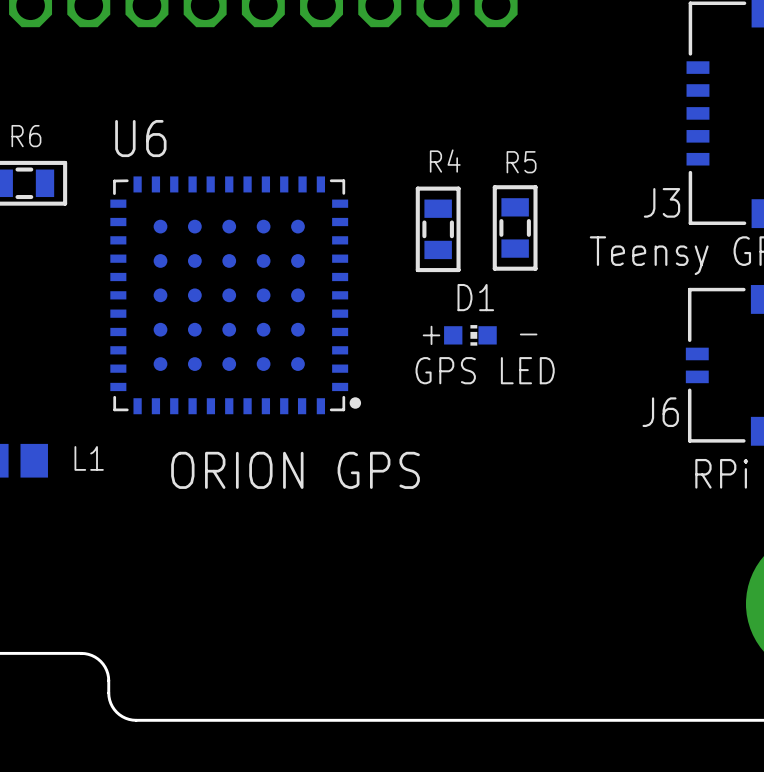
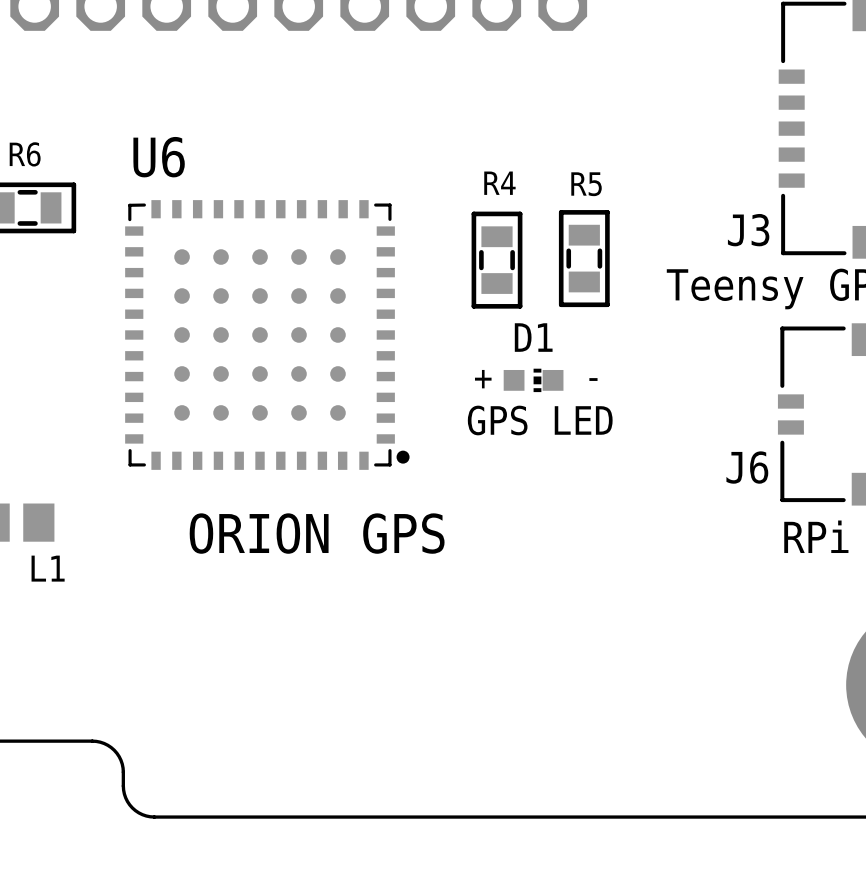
L1 name position: L1 (89, 458) -> L1 (48, 568)

